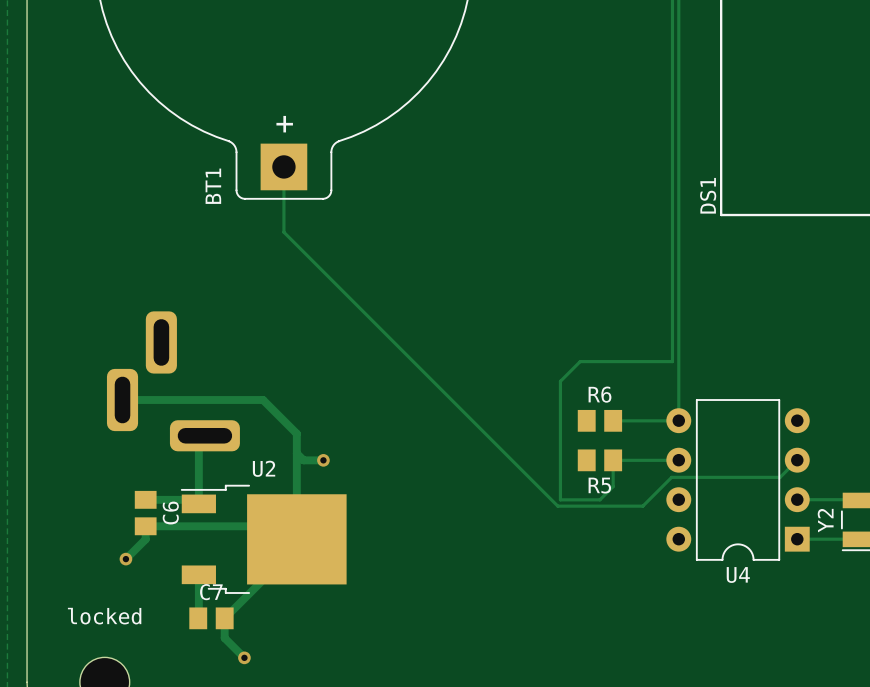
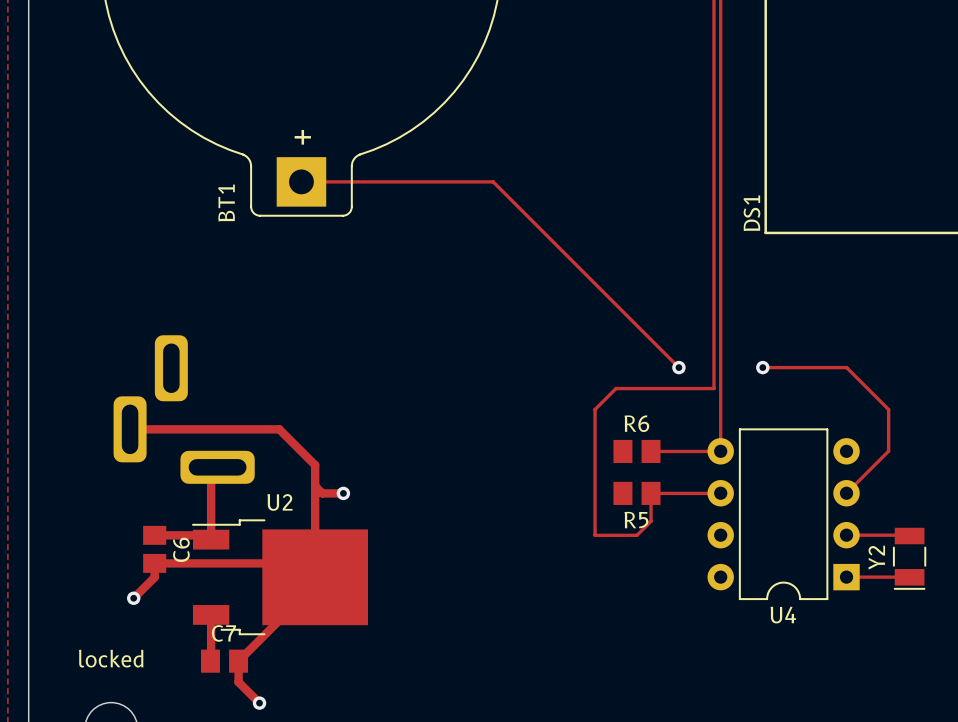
track: (283, 166) (283, 232) (557, 506) (642, 506) (671, 477) (780, 477) (797, 460) -> (301, 181) (493, 181) (678, 367)
via: none -> (678, 367)
track: none -> (762, 367) (846, 367) (888, 409) (888, 451) (846, 493)
via: none -> (762, 367)

